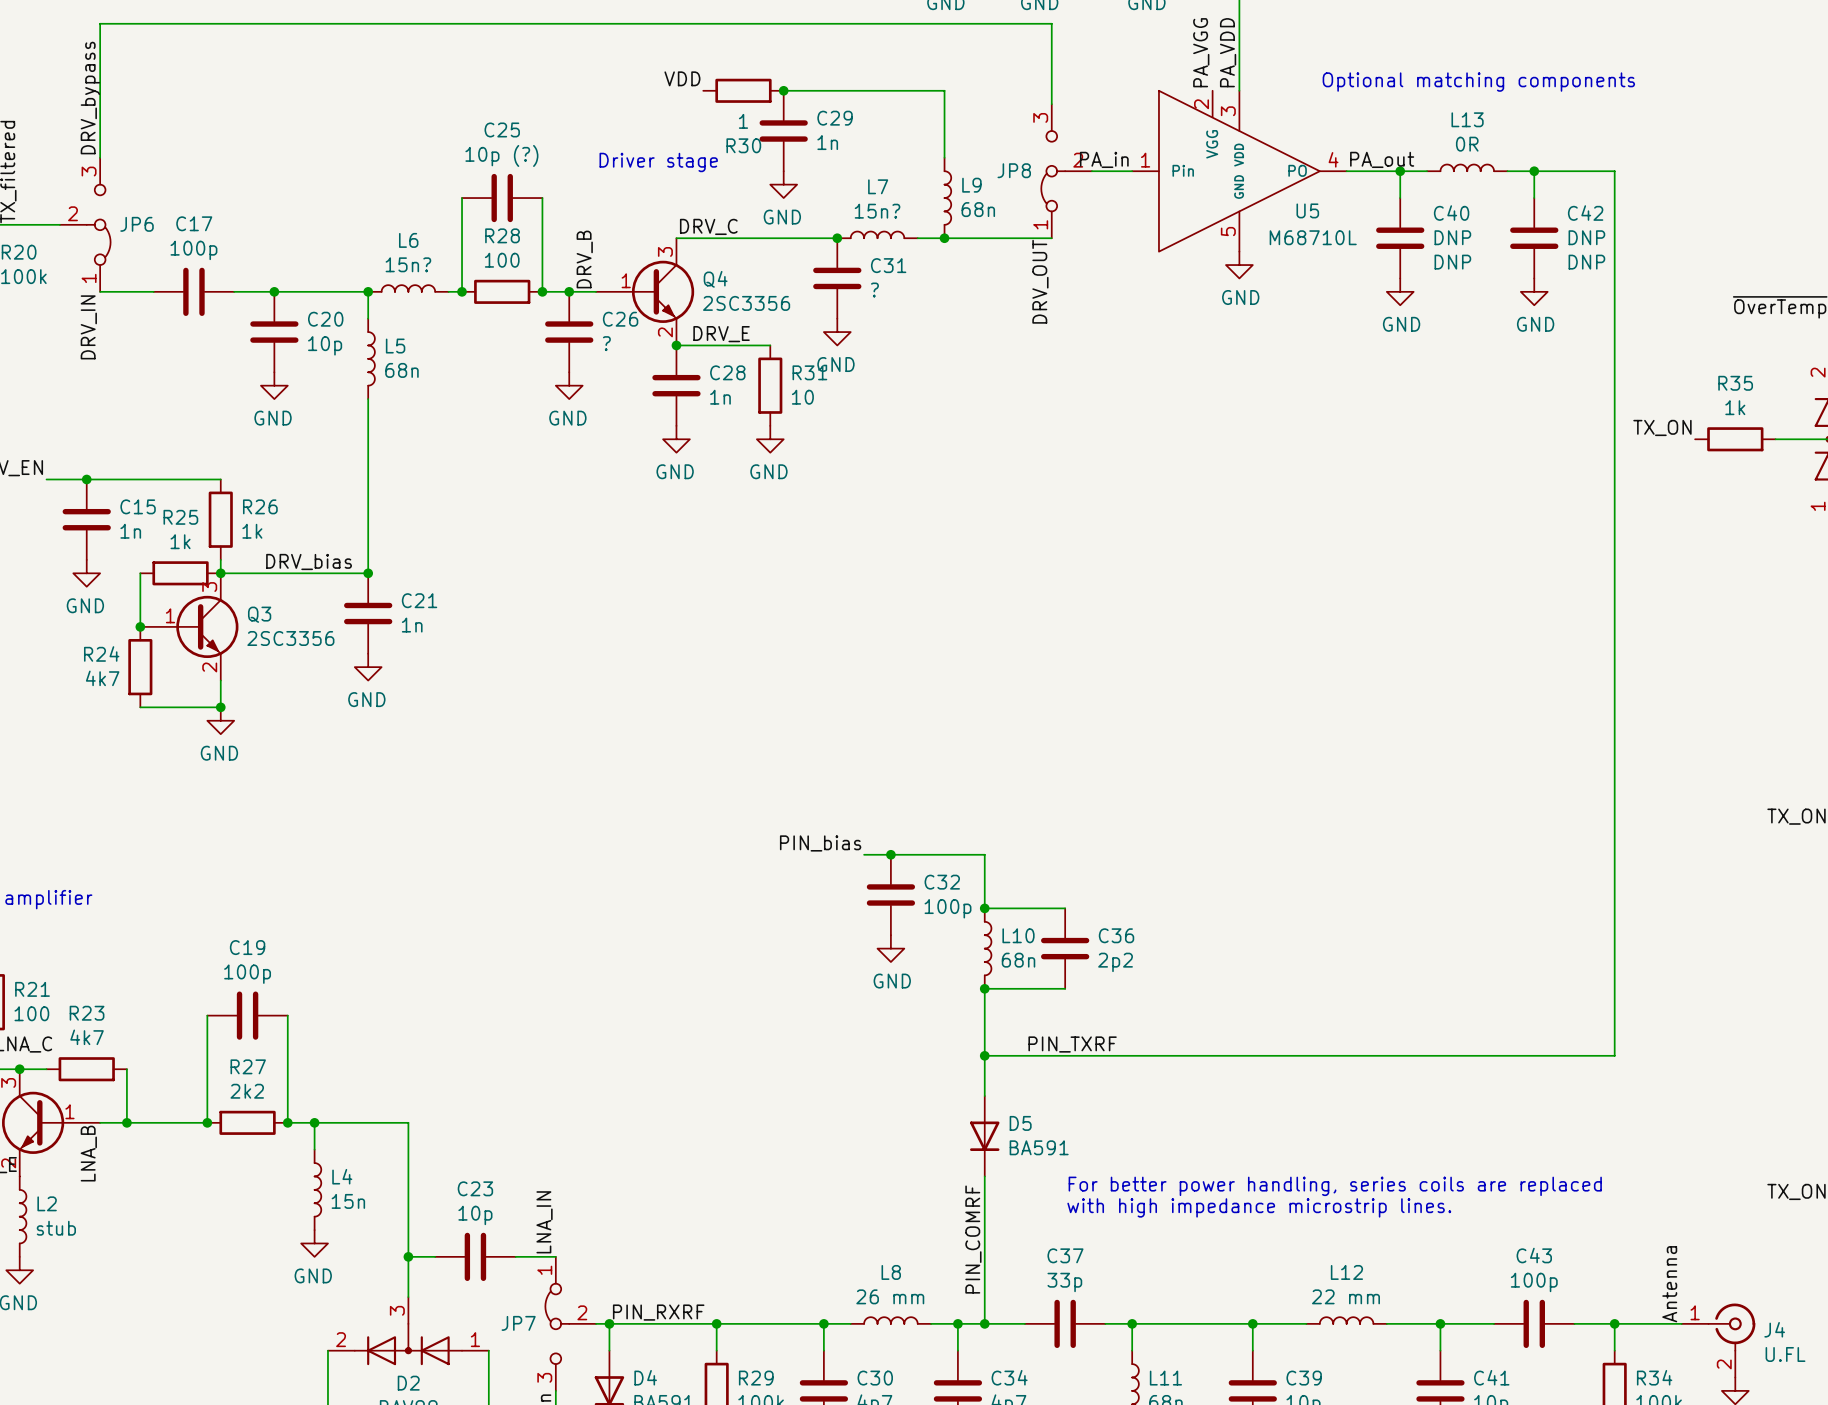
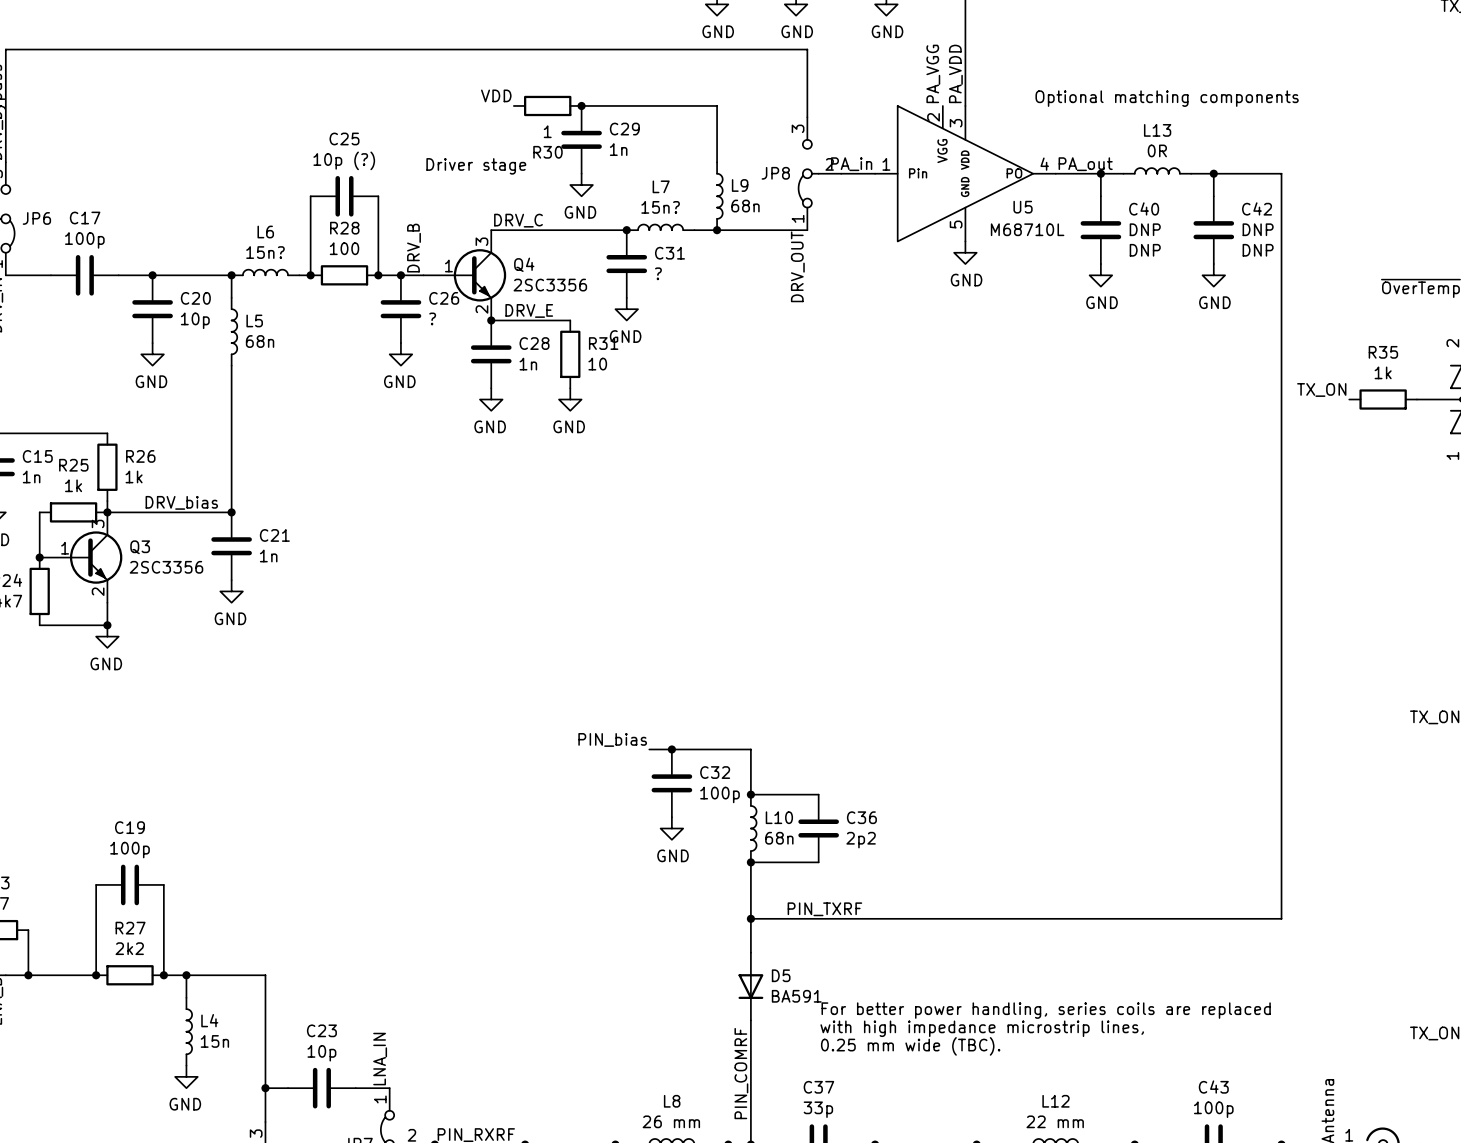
text: none -> For better power handling, series coils are replaced (1046, 1010)
text: For better power handling, series coils are replaced (1335, 1186) -> with high impedance microstrip lines, (982, 1028)
text: with high impedance microstrip lines. (1259, 1207) -> 0.25 mm wide (TBC). (910, 1046)

